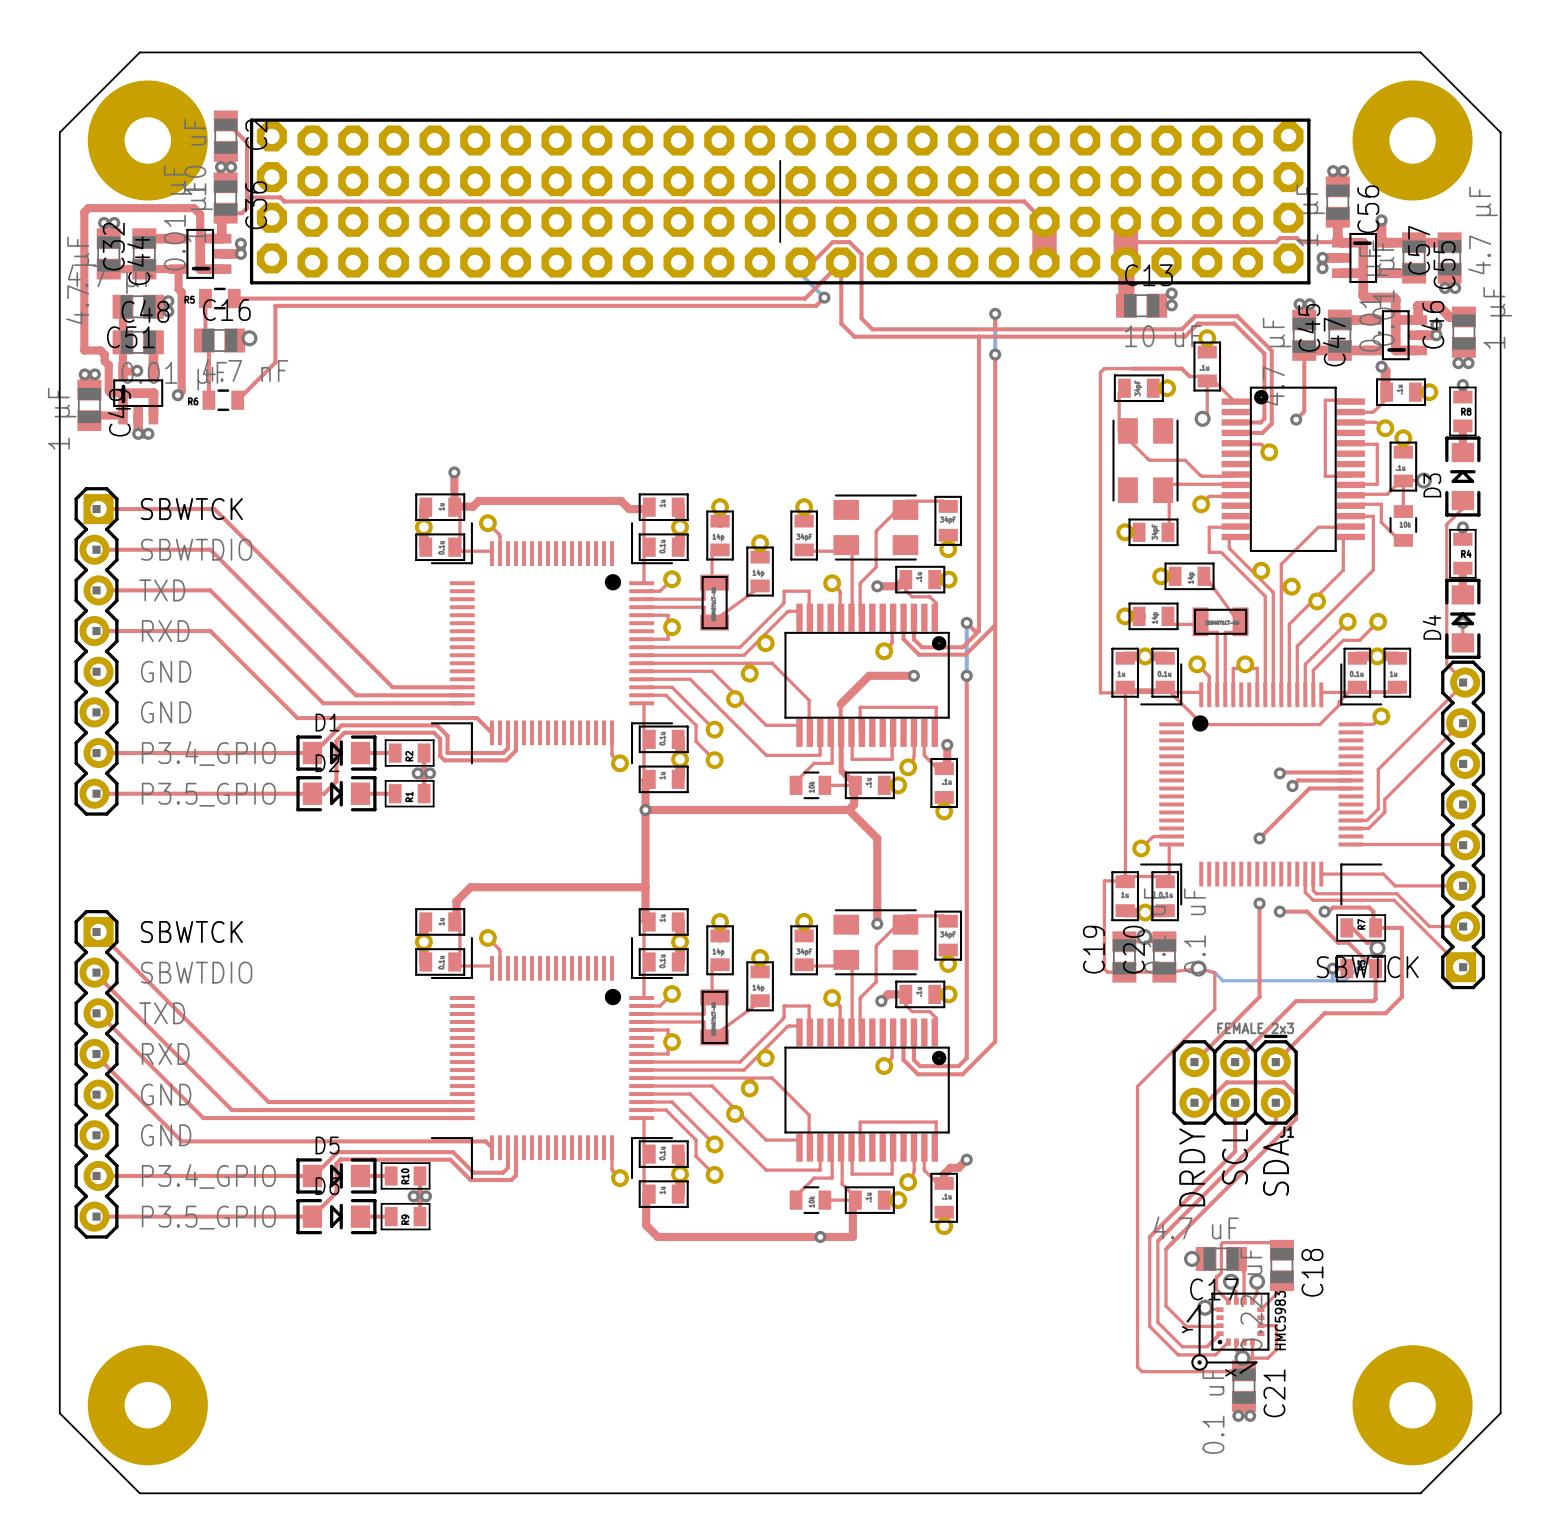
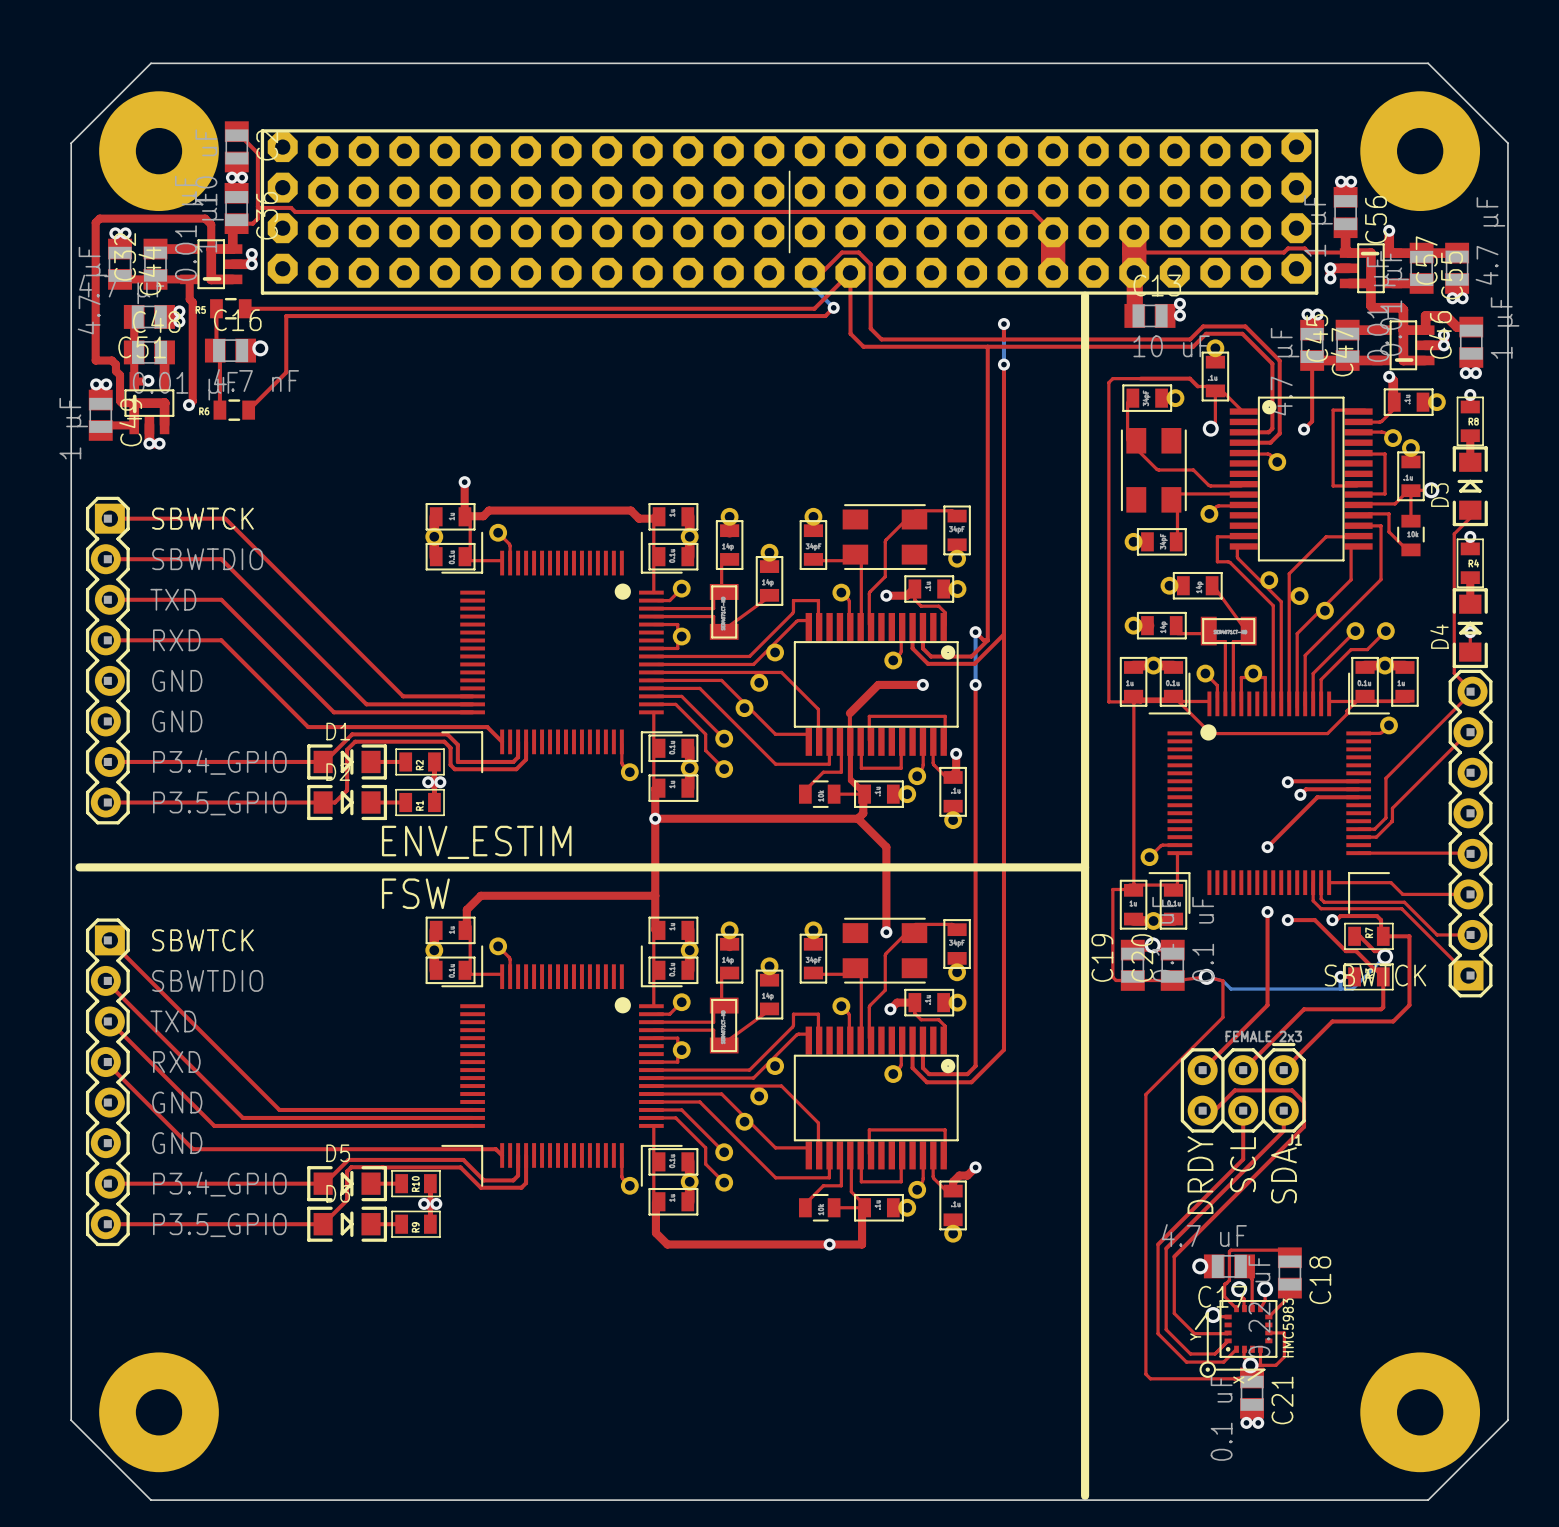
line: none -> (1085, 295) (1085, 1495)
text: none -> ENV_ESTIM (476, 842)
line: none -> (79, 867) (1085, 867)
text: none -> FSW (415, 893)

